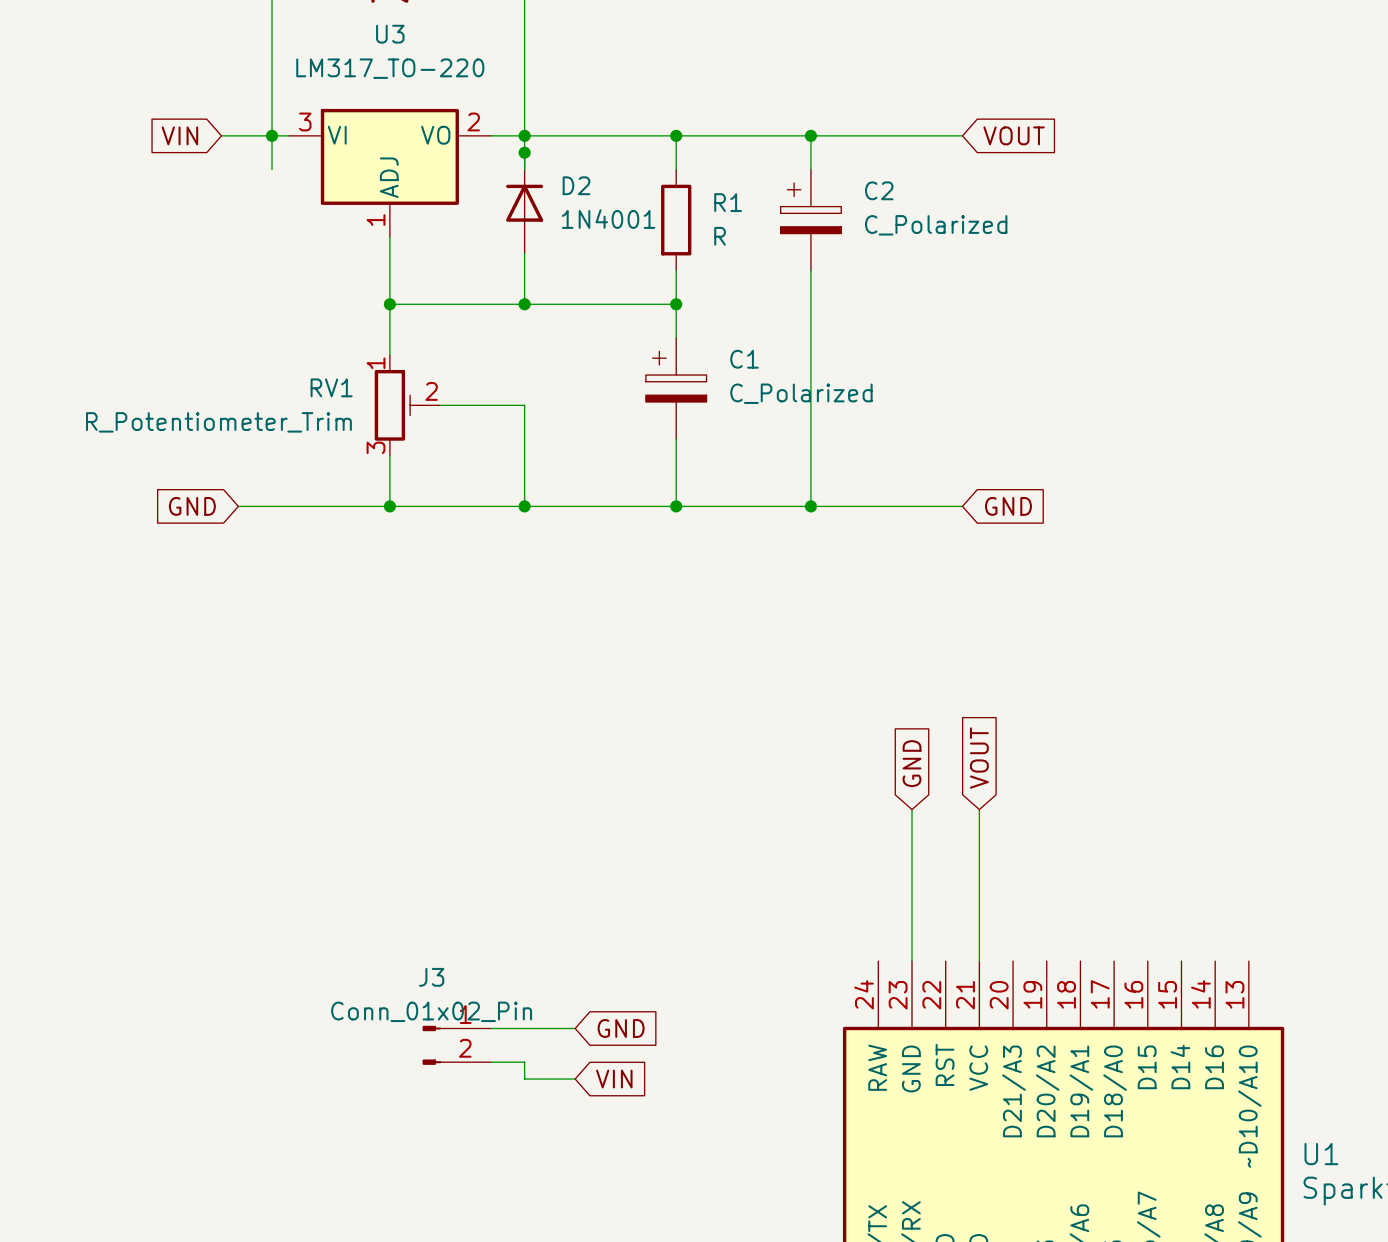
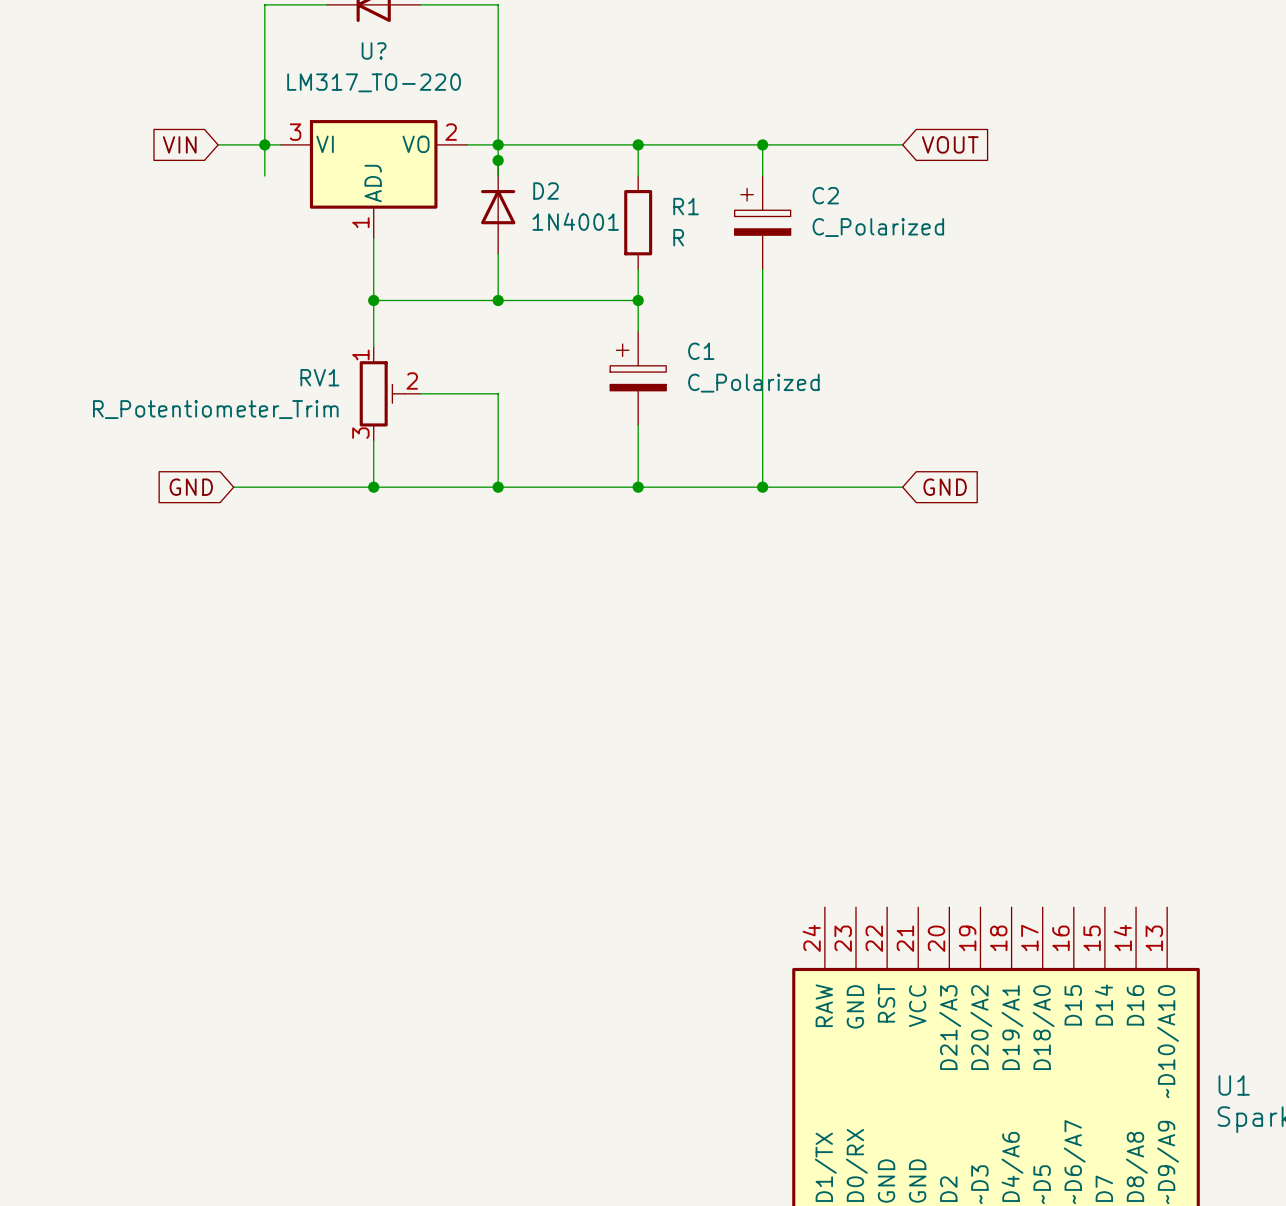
U3 name: U3 (390, 34) -> U? (374, 50)
global label: VOUT (979, 758) -> none
global label: GND (912, 763) -> none
wire: (912, 809) (912, 961) -> none
wire: (979, 809) (979, 961) -> none
wire: (490, 1028) (575, 1028) -> none
global label: GND (621, 1028) -> none
J3: Conn_01x02_Pin (456, 1045) -> none
wire: (490, 1062) (524, 1062) (524, 1079) (575, 1079) -> none
global label: VIN (614, 1079) -> none

